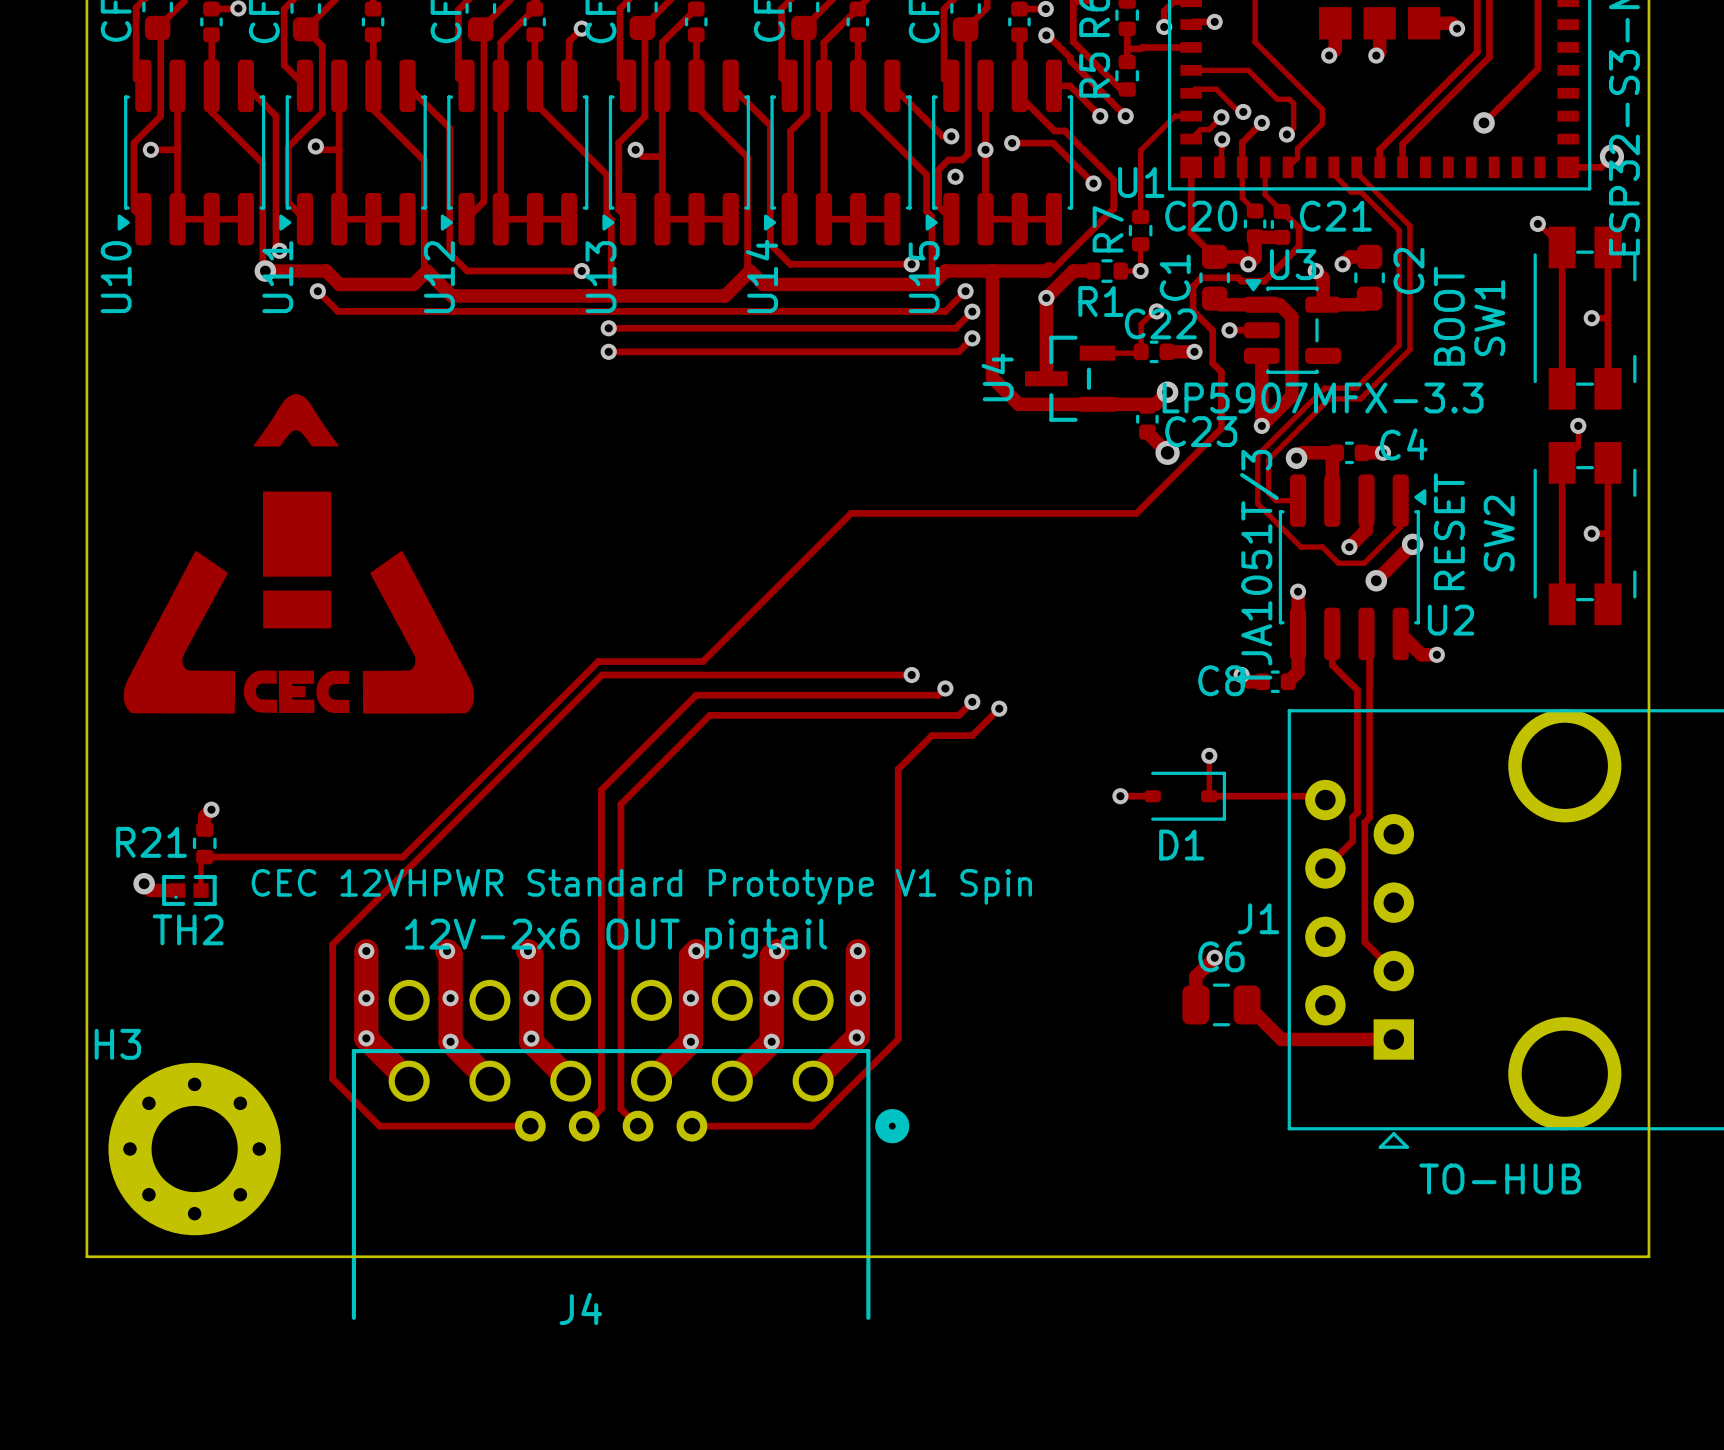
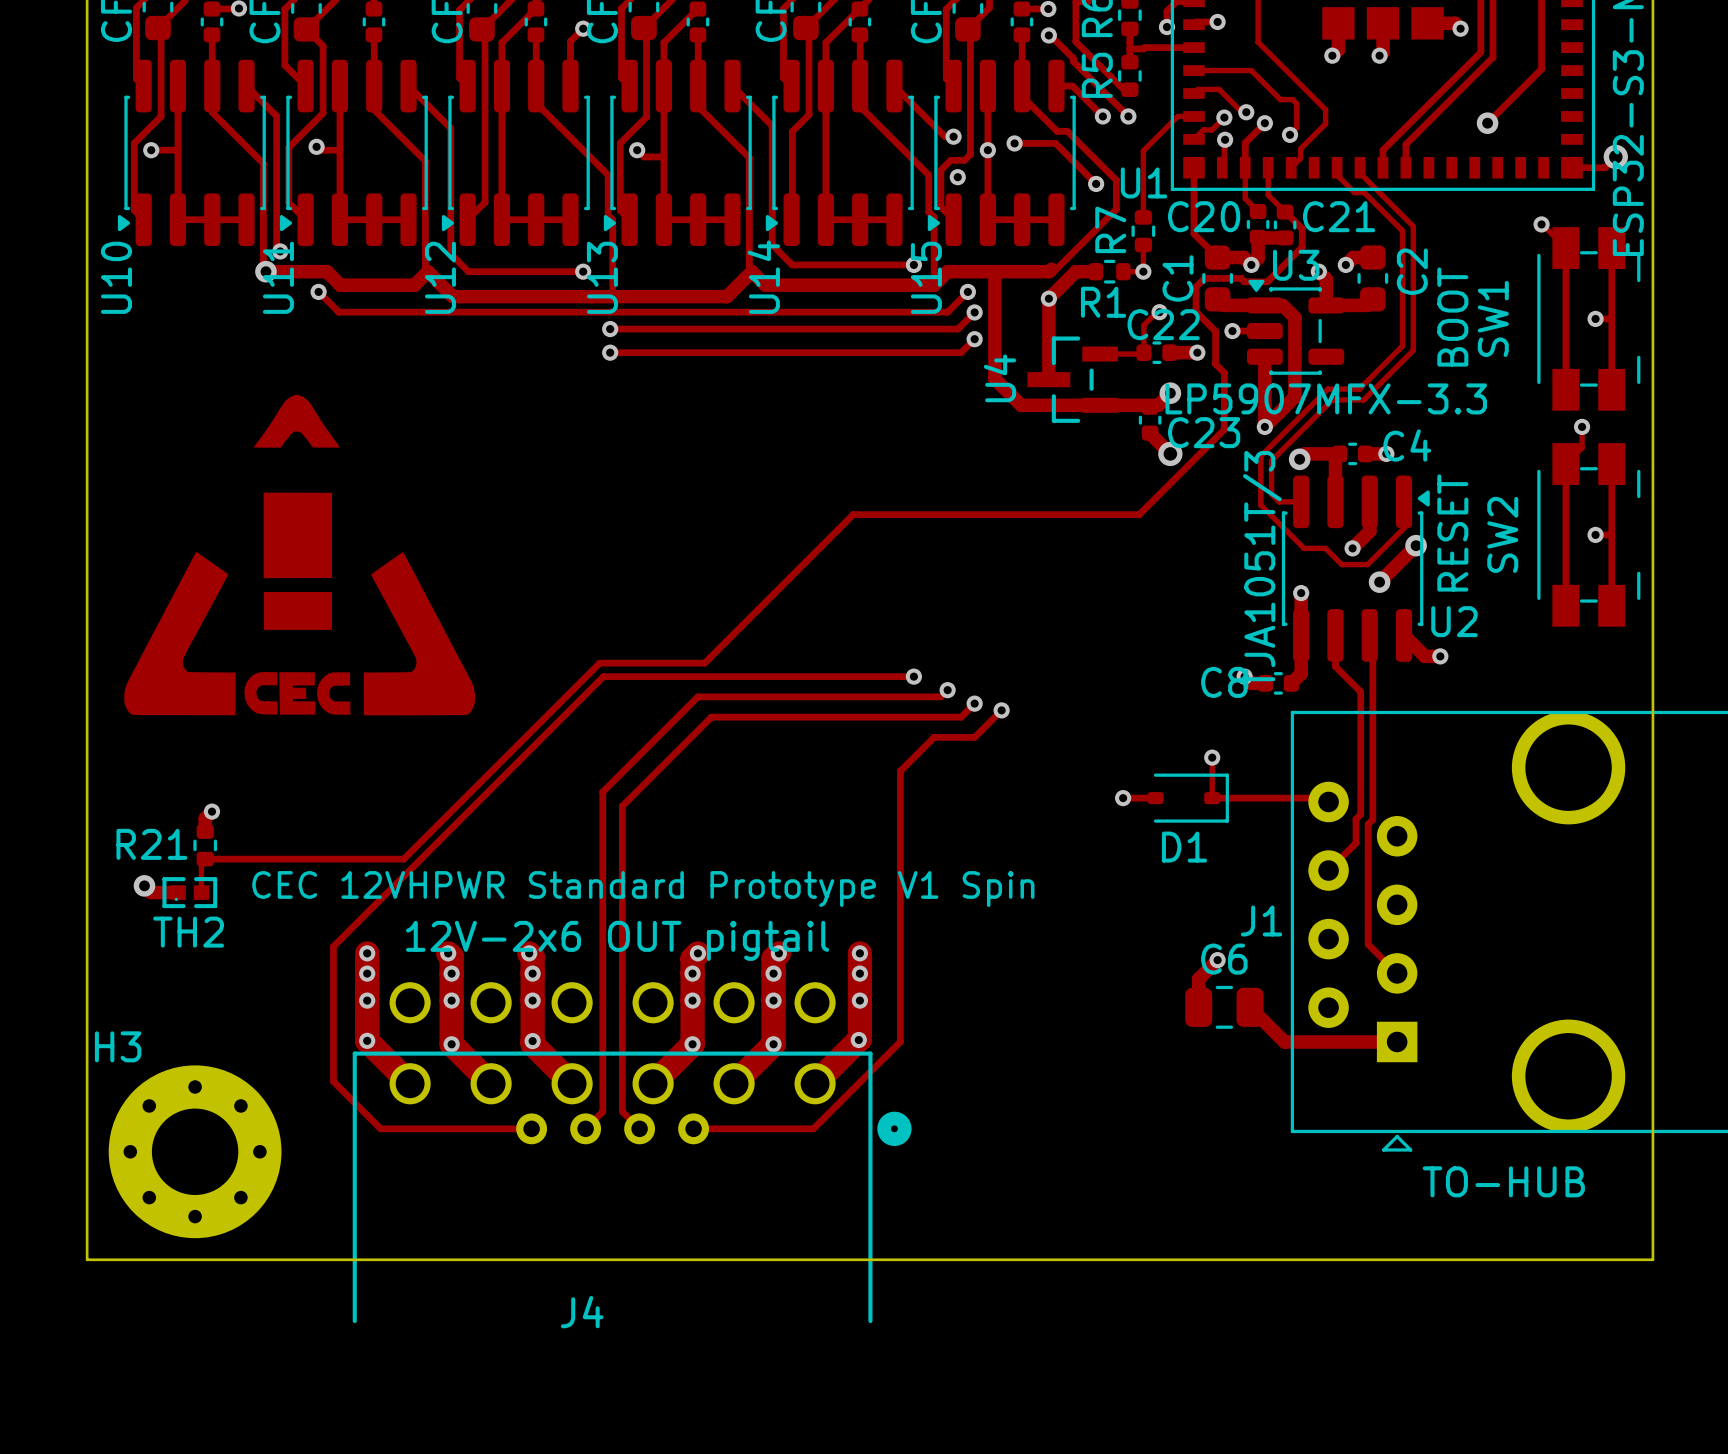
via: none -> (367, 973)
via: none -> (451, 973)
via: none -> (532, 973)
via: none -> (692, 973)
via: none -> (773, 973)
via: none -> (859, 973)

